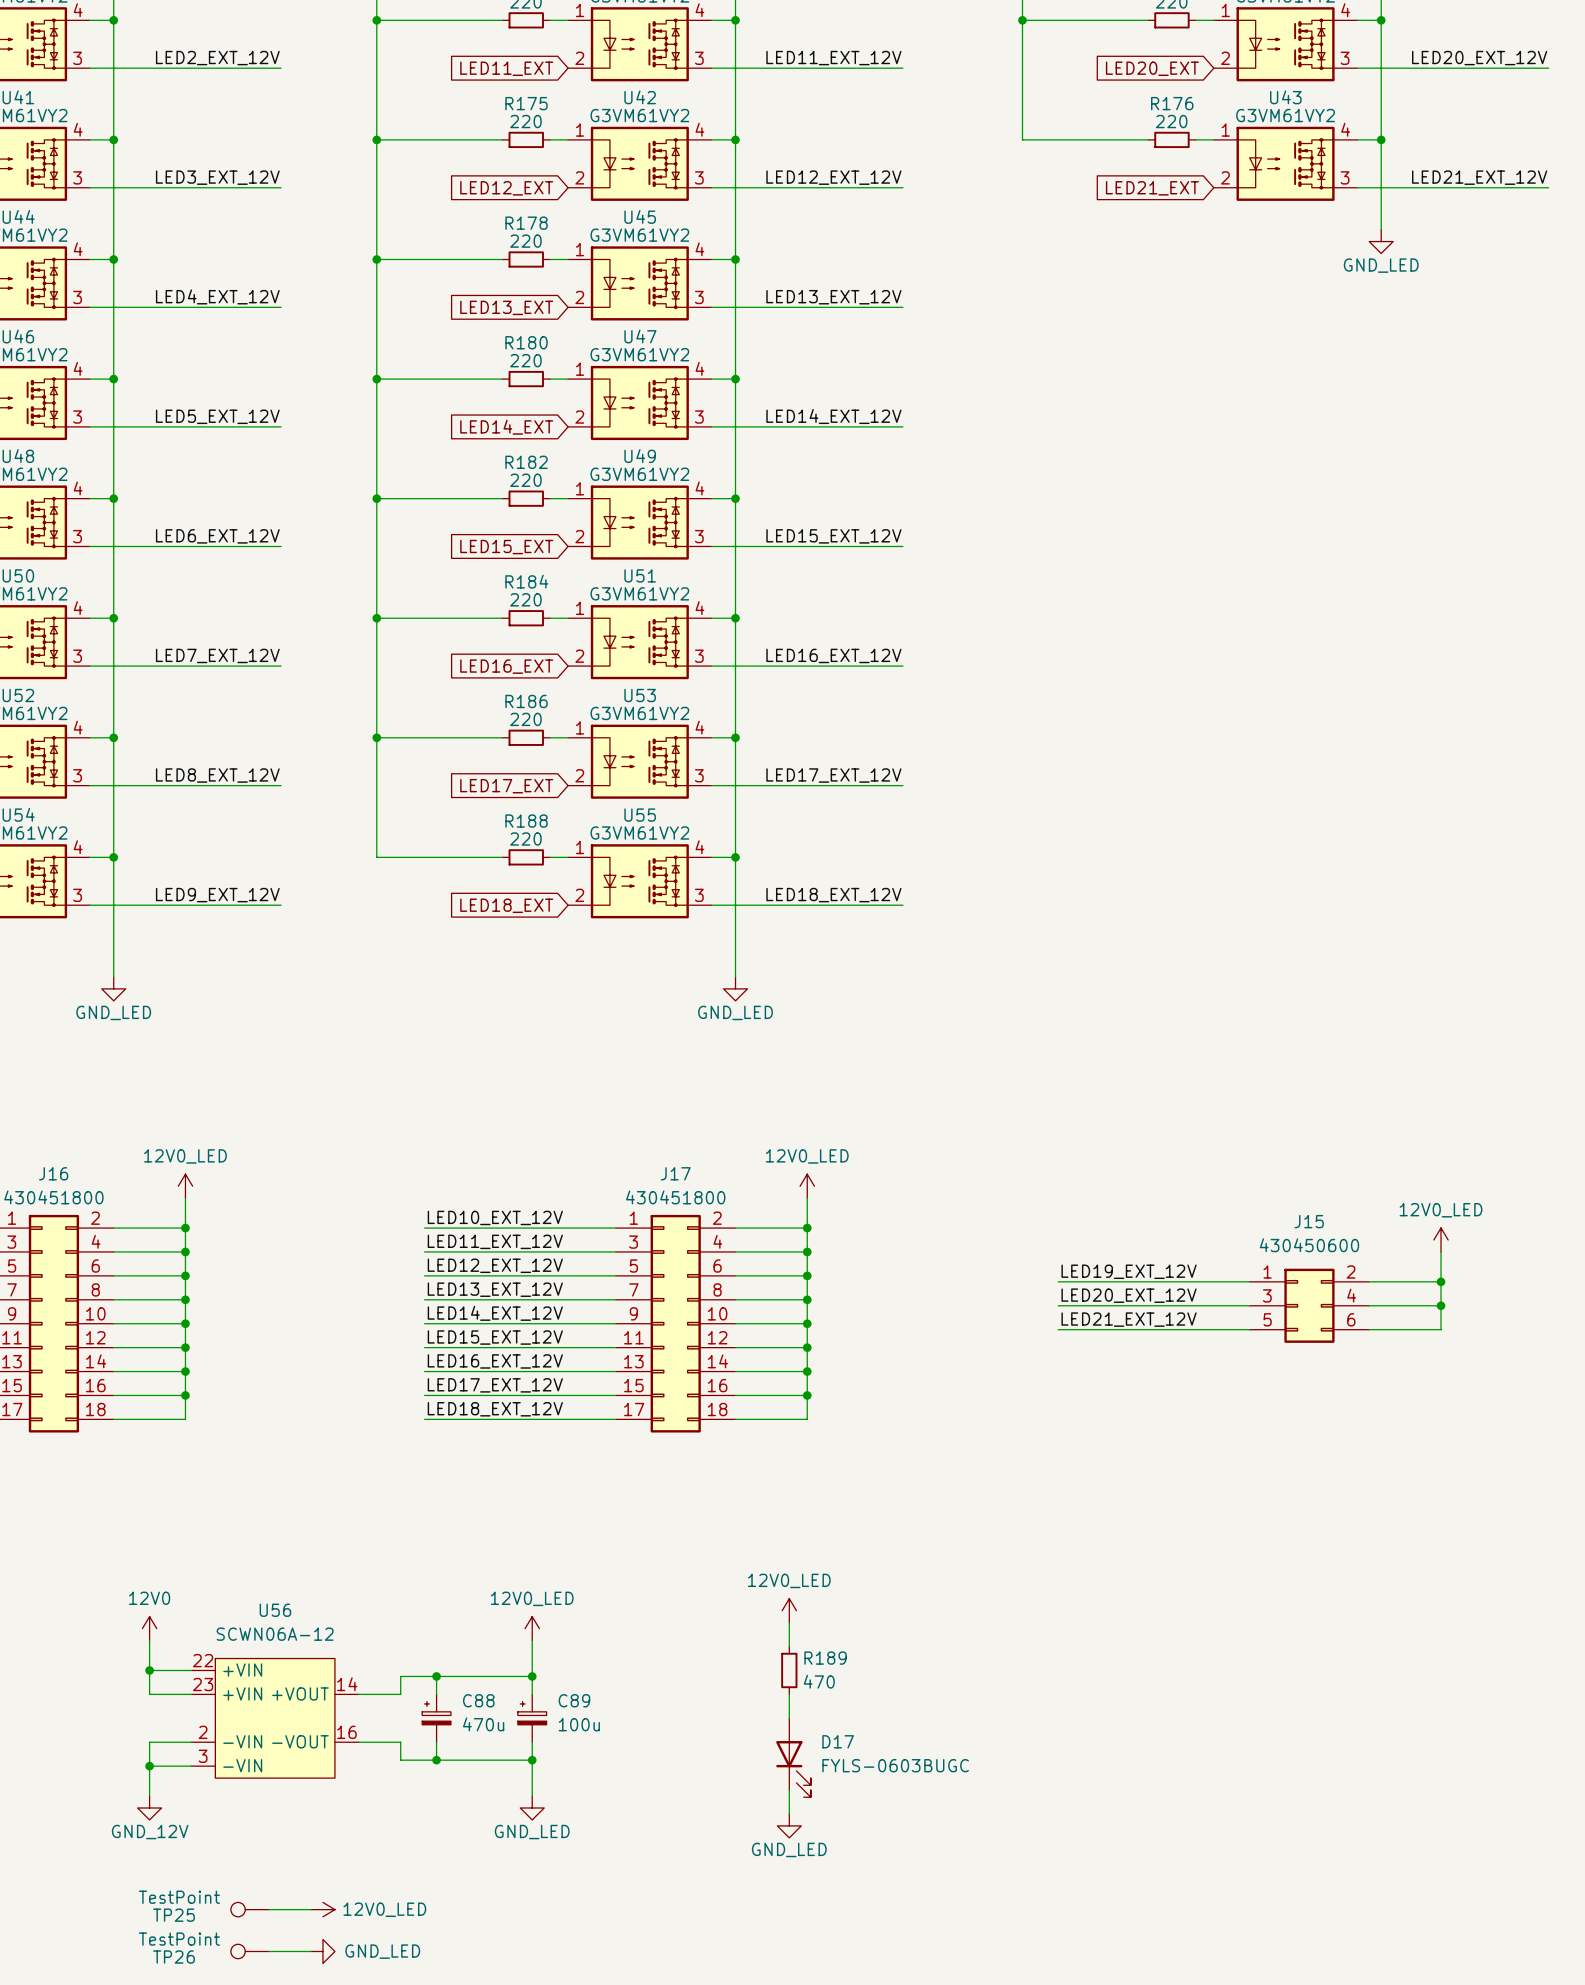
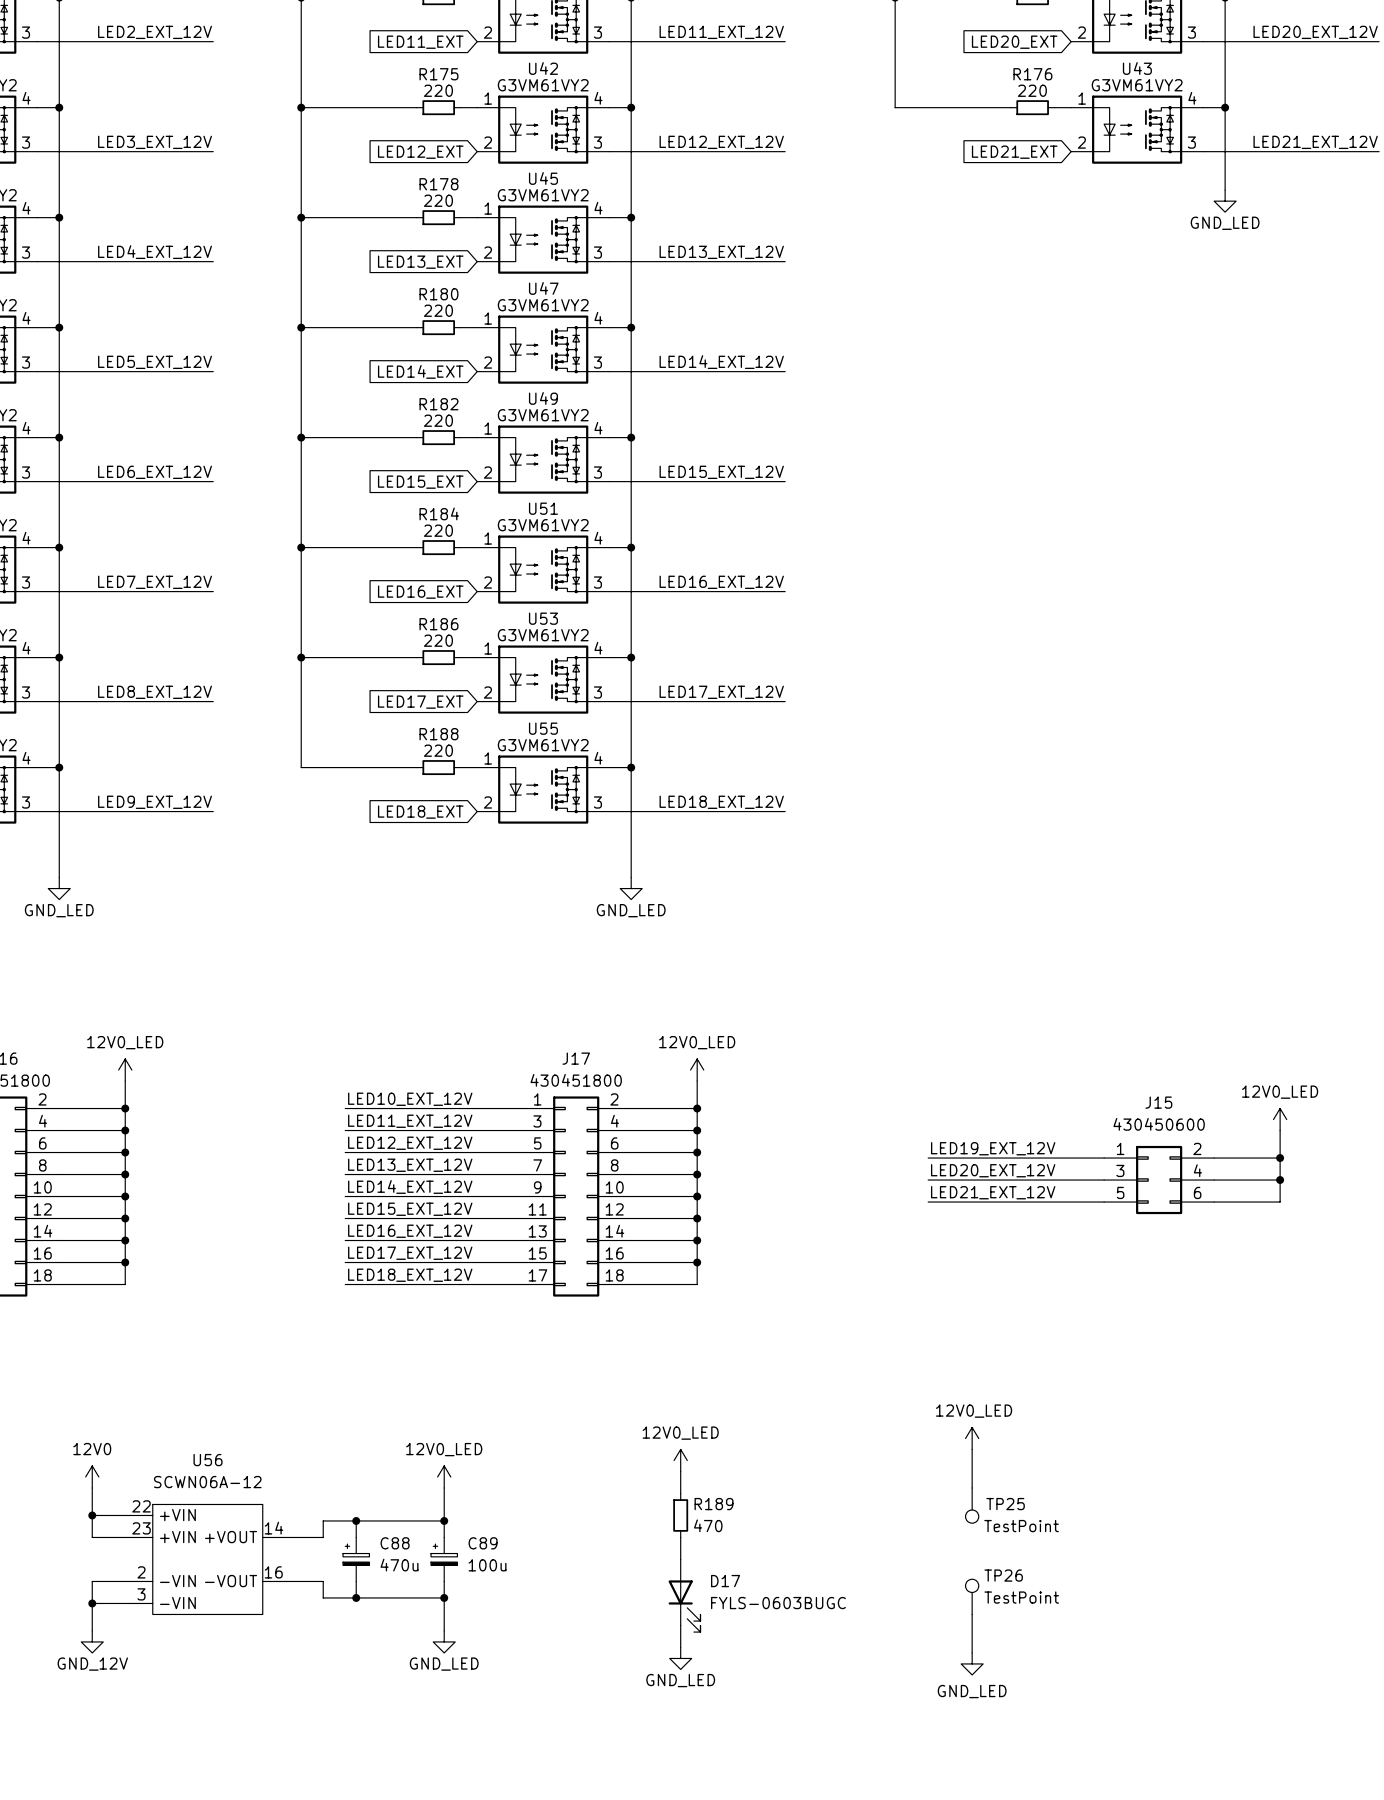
power symbol: none -> 12V0_LED (972, 1438)
wire: none -> (972, 1449) (972, 1487)
wire: none -> (972, 1614) (972, 1652)
power symbol: none -> GND_LED (972, 1663)
TP25 value position: TestPoint (179, 1897) -> TestPoint (1021, 1526)
TP25 rotation: 0° (238, 1909) -> 90° counterclockwise (972, 1516)
TP25 position: (250, 1909) -> (972, 1505)
wire: (269, 1909) (311, 1909) -> none
power symbol: 12V0_LED (322, 1909) -> none
TP25 name position: TP25 (173, 1915) -> TP25 (1005, 1504)
TP26 value position: TestPoint (179, 1939) -> TestPoint (1021, 1597)
TP26 rotation: 0° (238, 1951) -> 90° clockwise (972, 1585)
TP26 position: (250, 1951) -> (972, 1596)
wire: (269, 1951) (311, 1951) -> none
power symbol: GND_LED (322, 1951) -> none
TP26 name position: TP26 (173, 1957) -> TP26 (1003, 1575)

